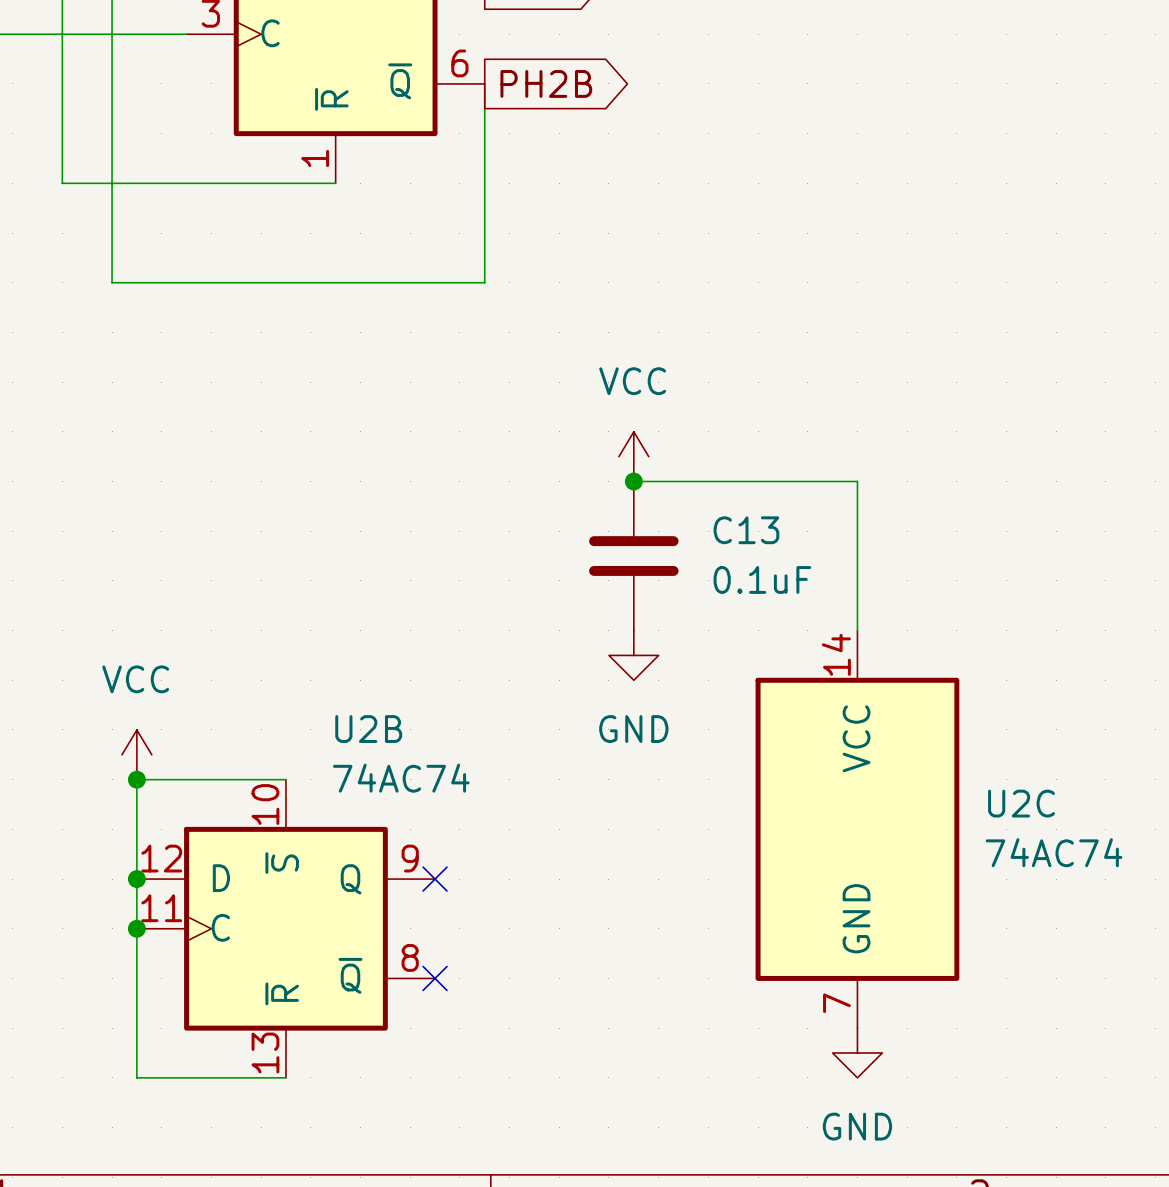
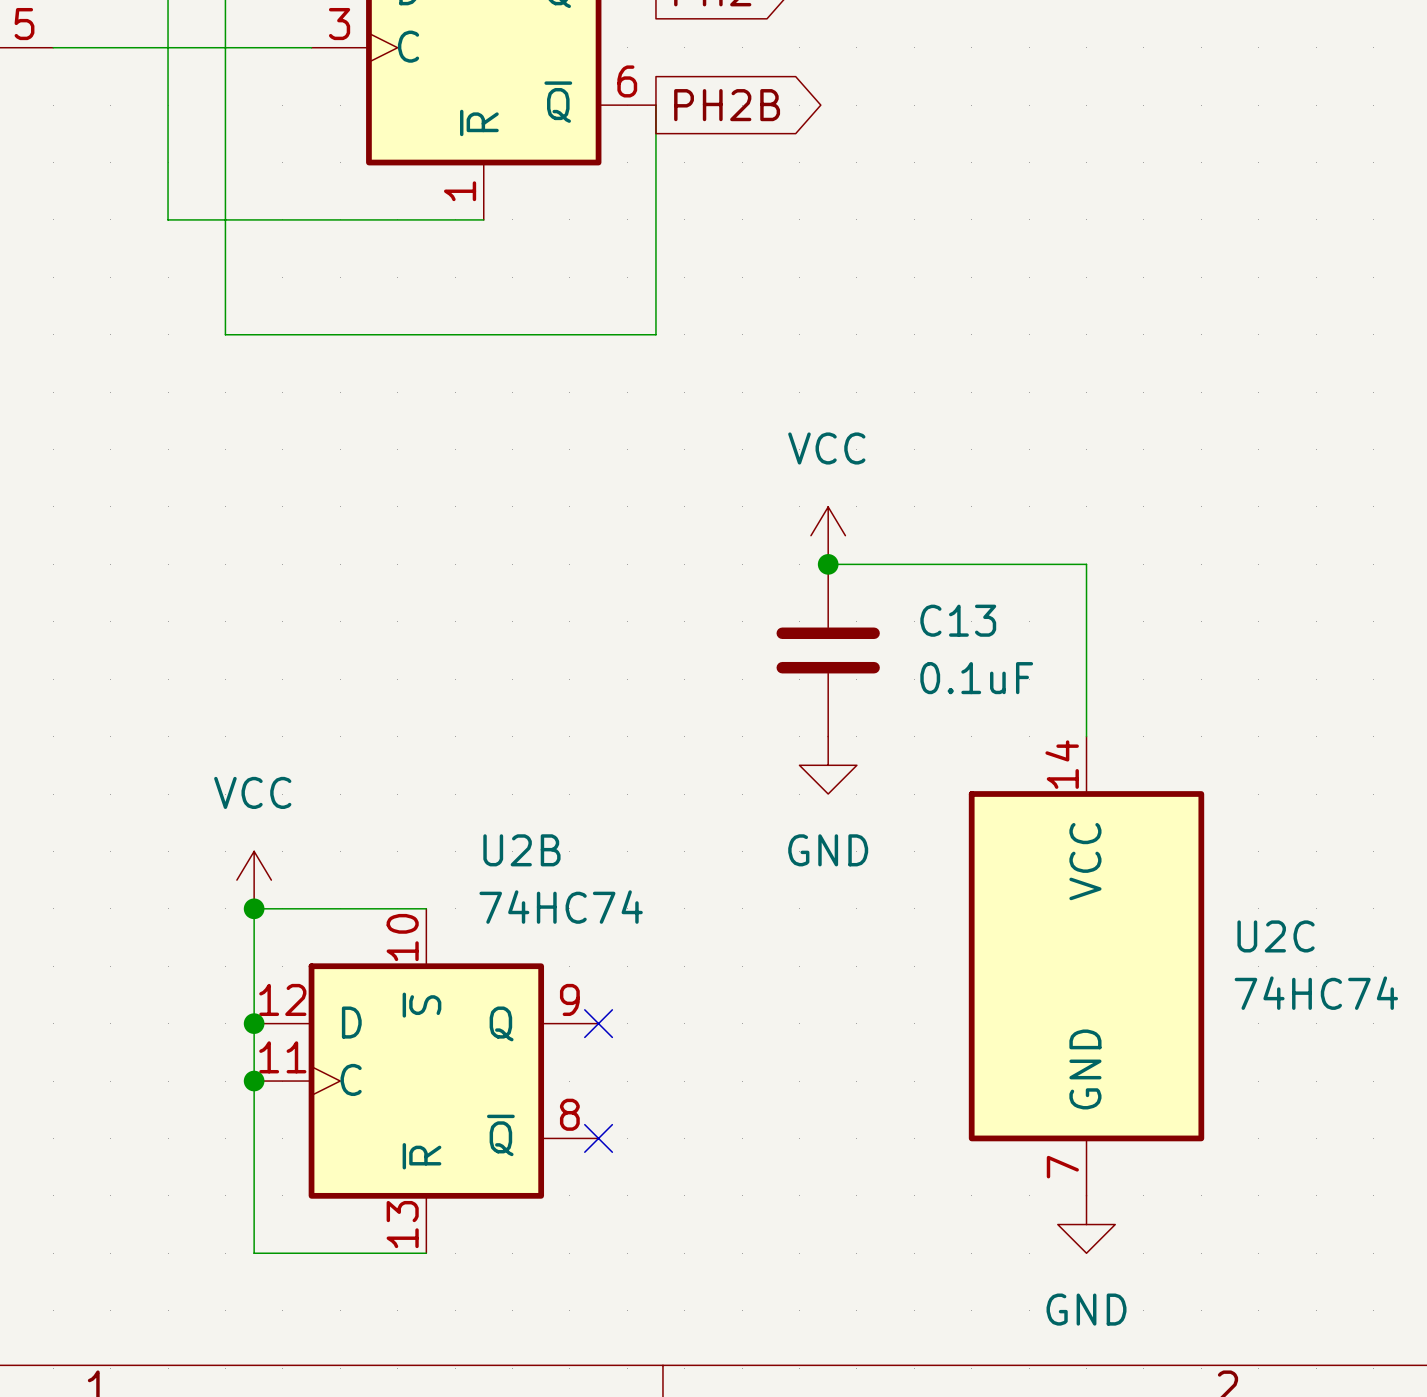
U2B value: 74AC74 (401, 778) -> 74HC74 (561, 907)
U2C value: 74AC74 (1054, 852) -> 74HC74 (1316, 993)

